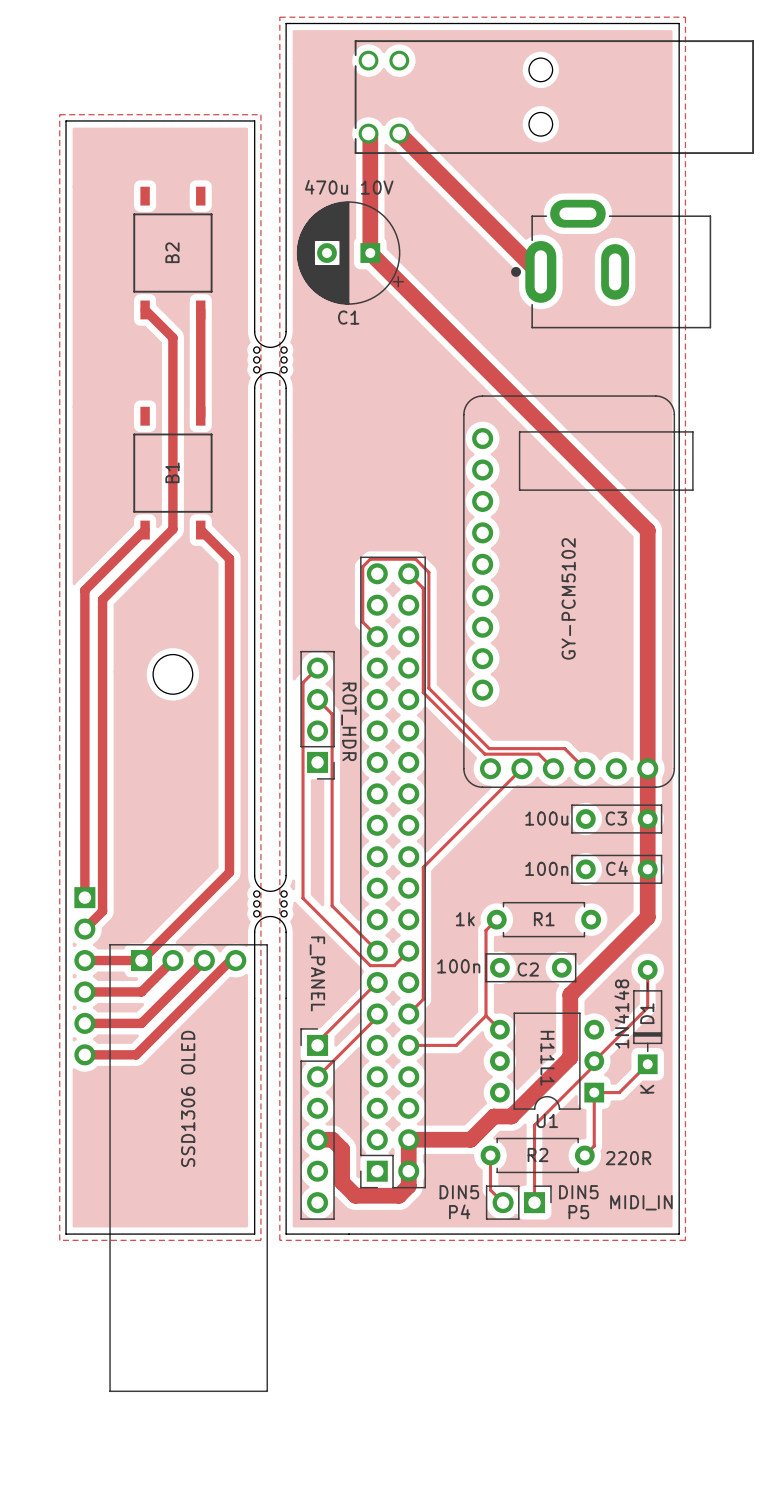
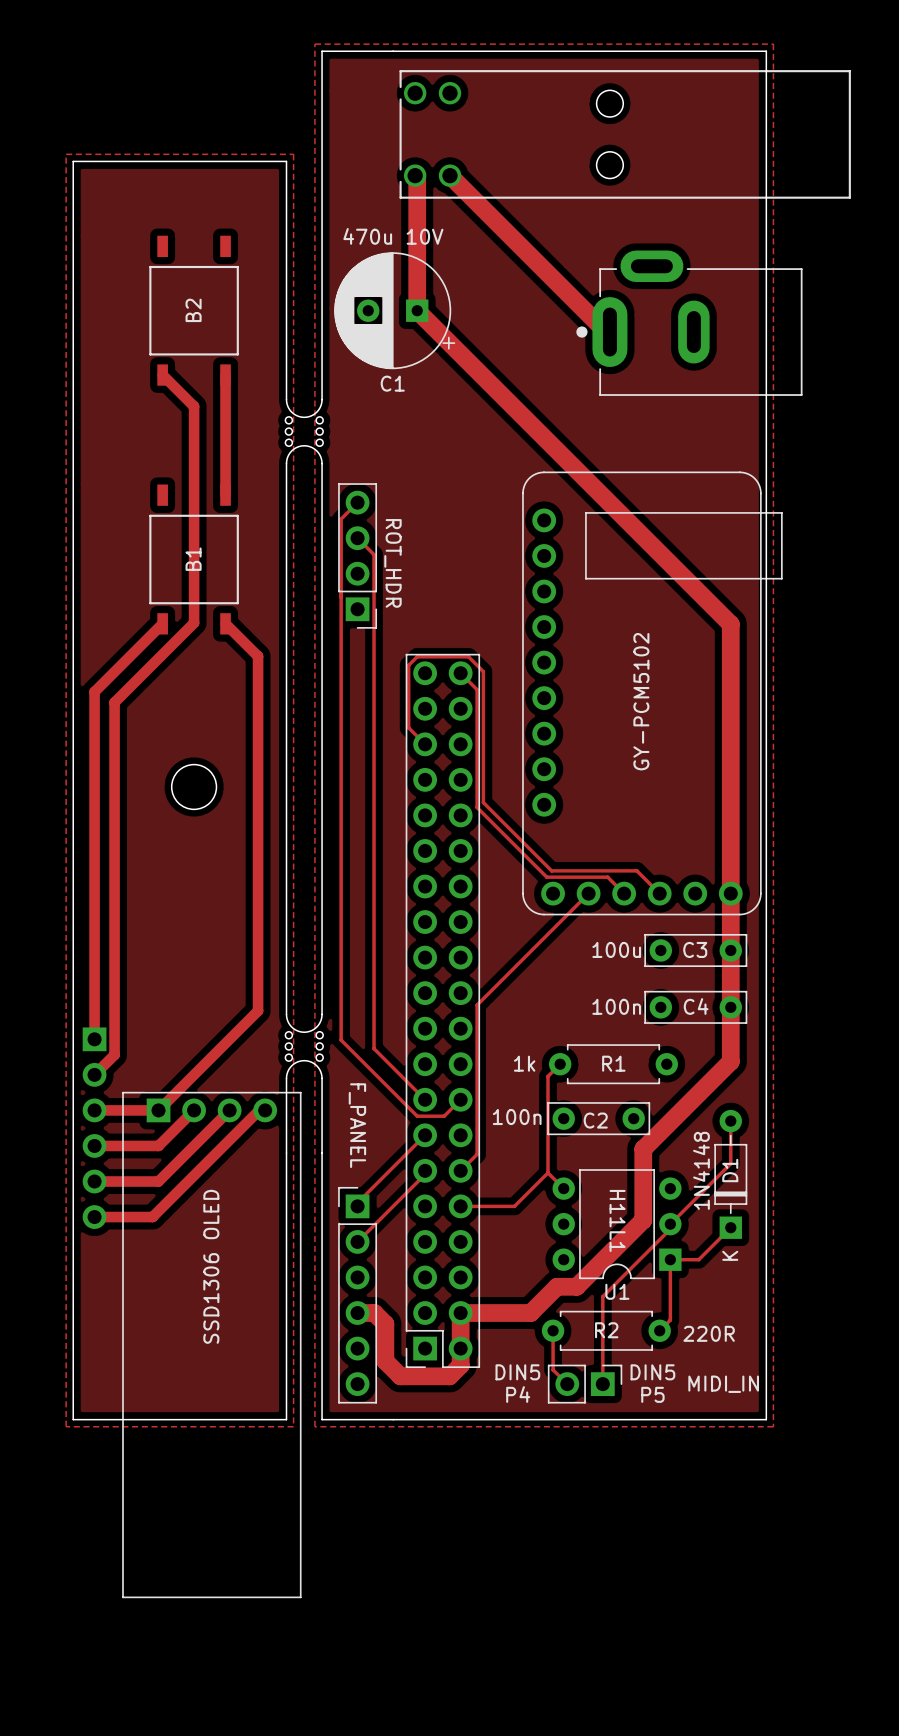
track: (317, 668) (303, 682) -> (357, 502) (341, 519) (341, 796)
track: (317, 699) (332, 714) -> (357, 538) (374, 554) (374, 831)
part position: (317, 715) -> (357, 555)

